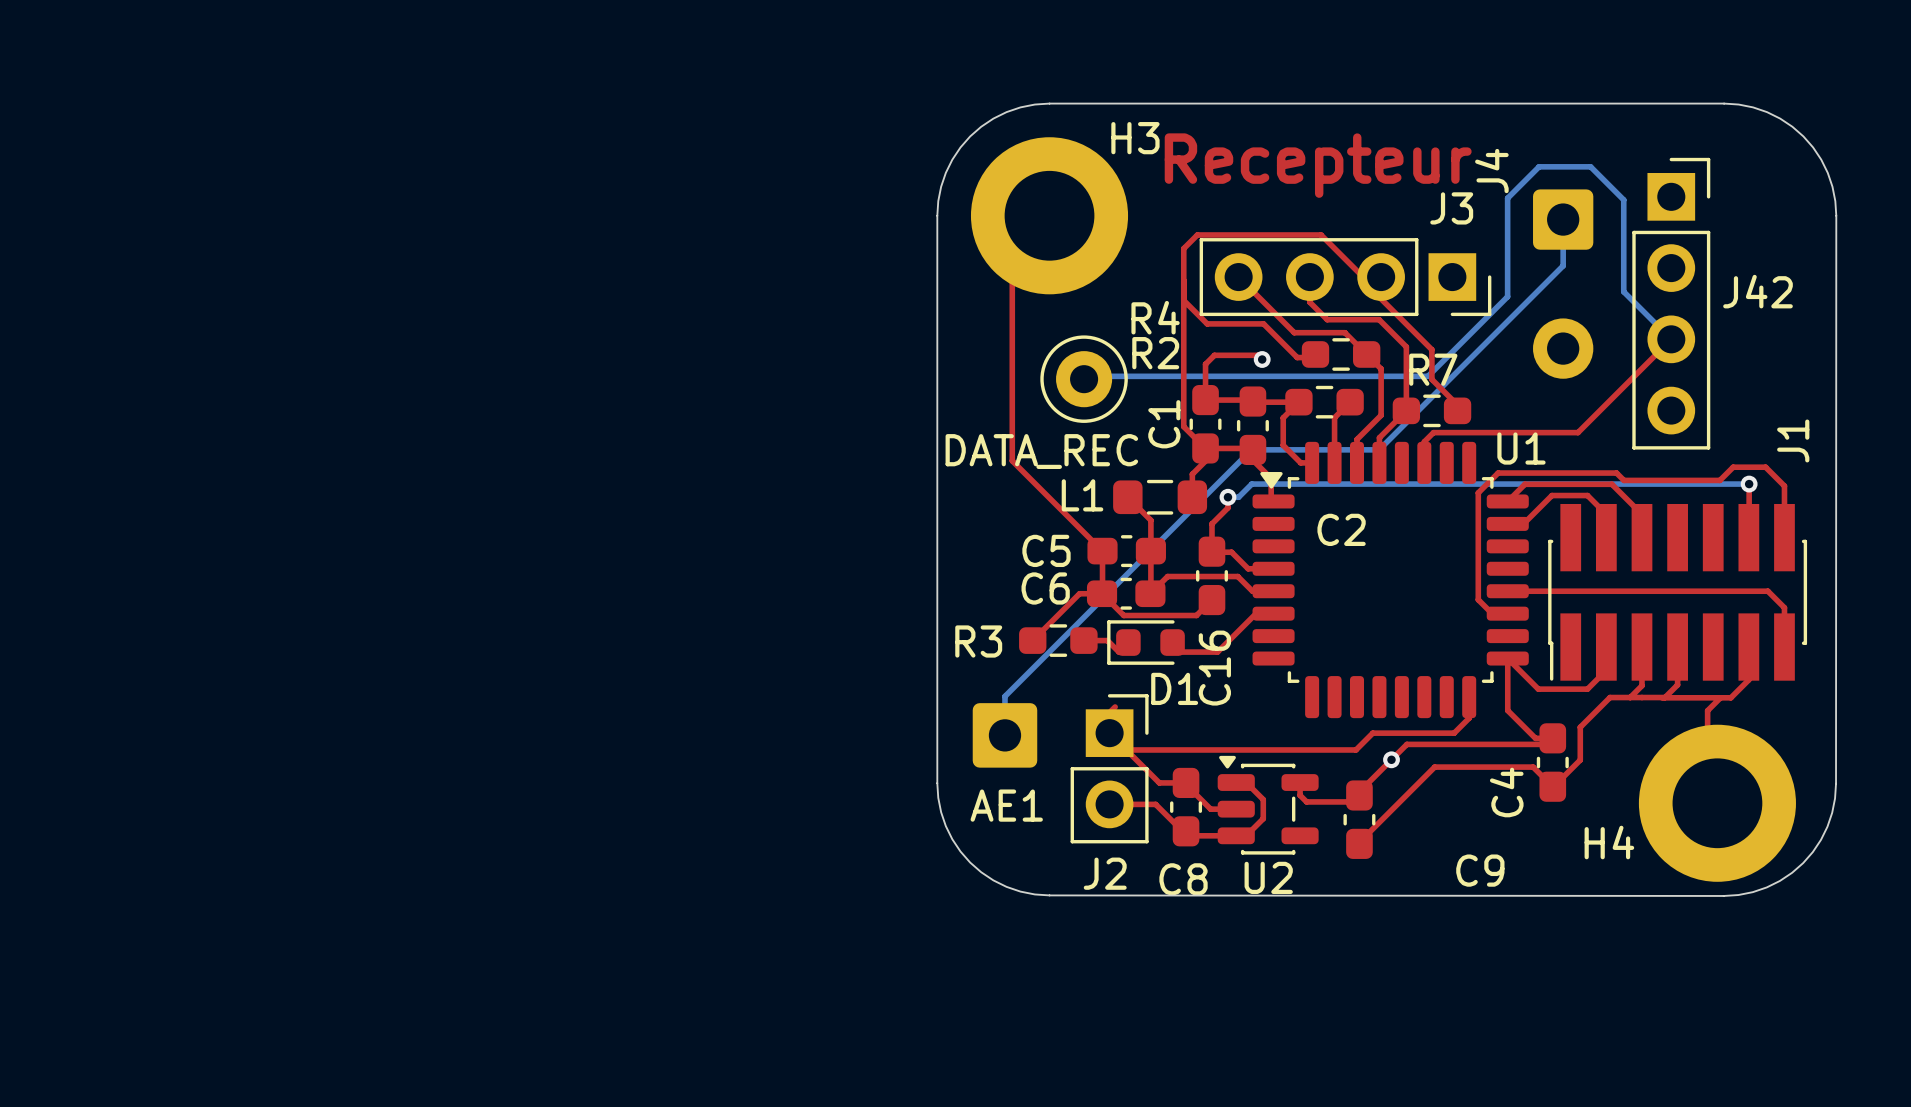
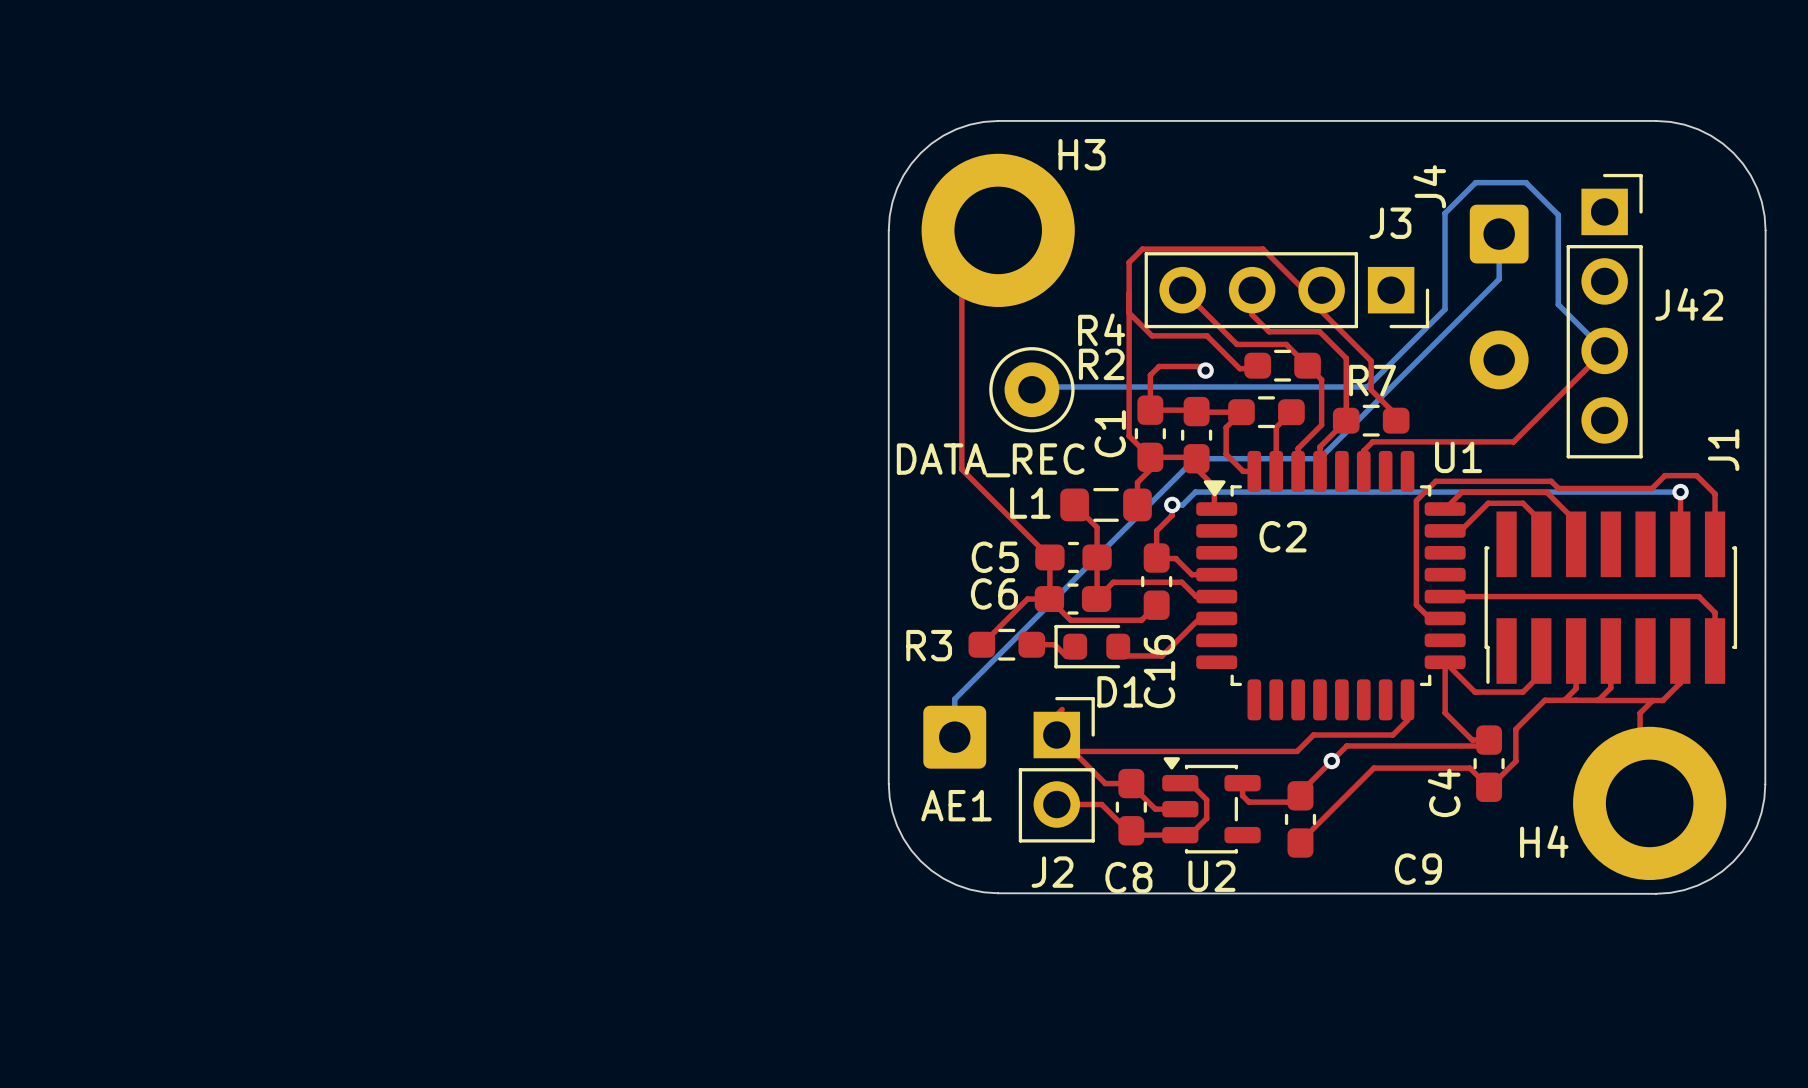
text: Recepteur (1318, 165) -> none

